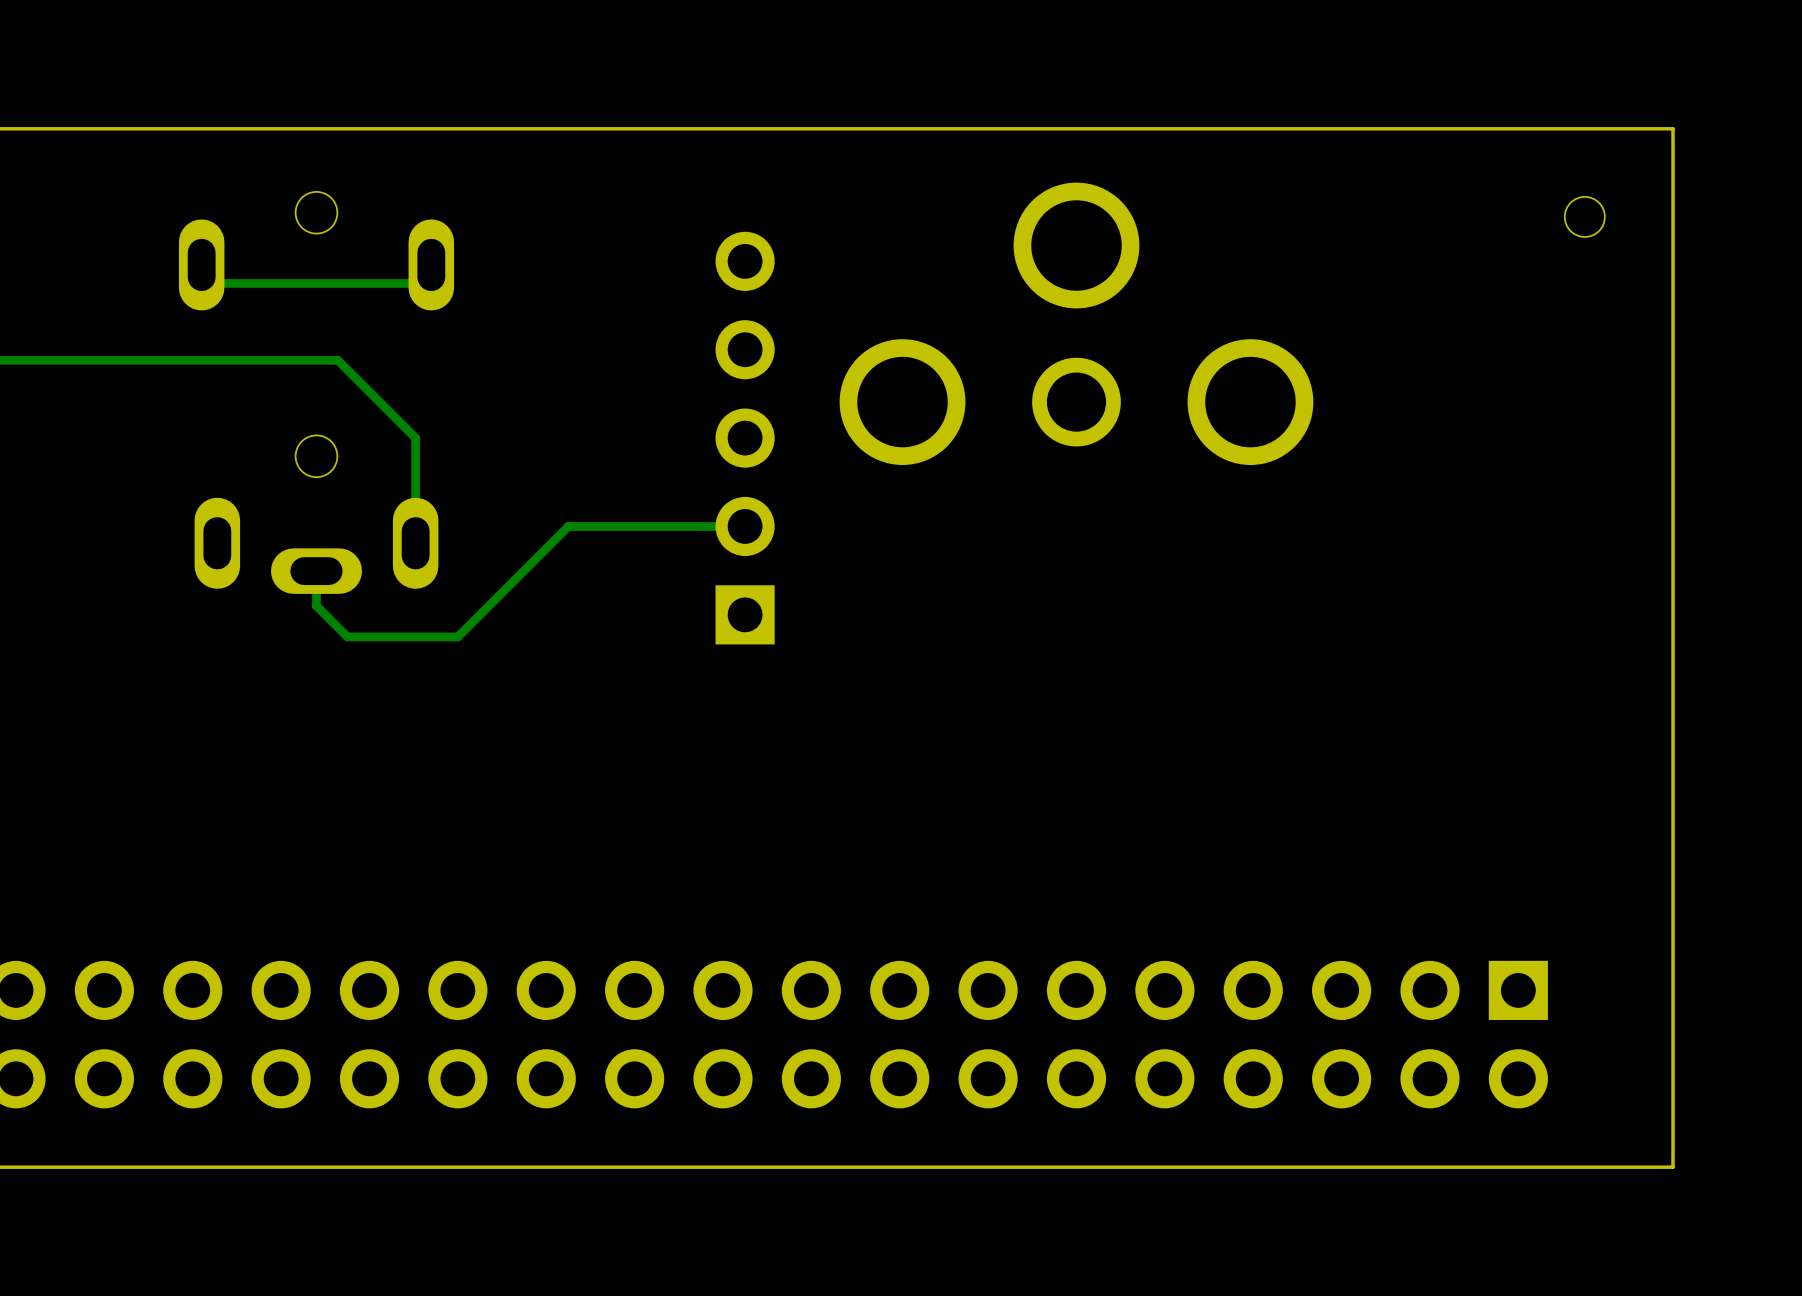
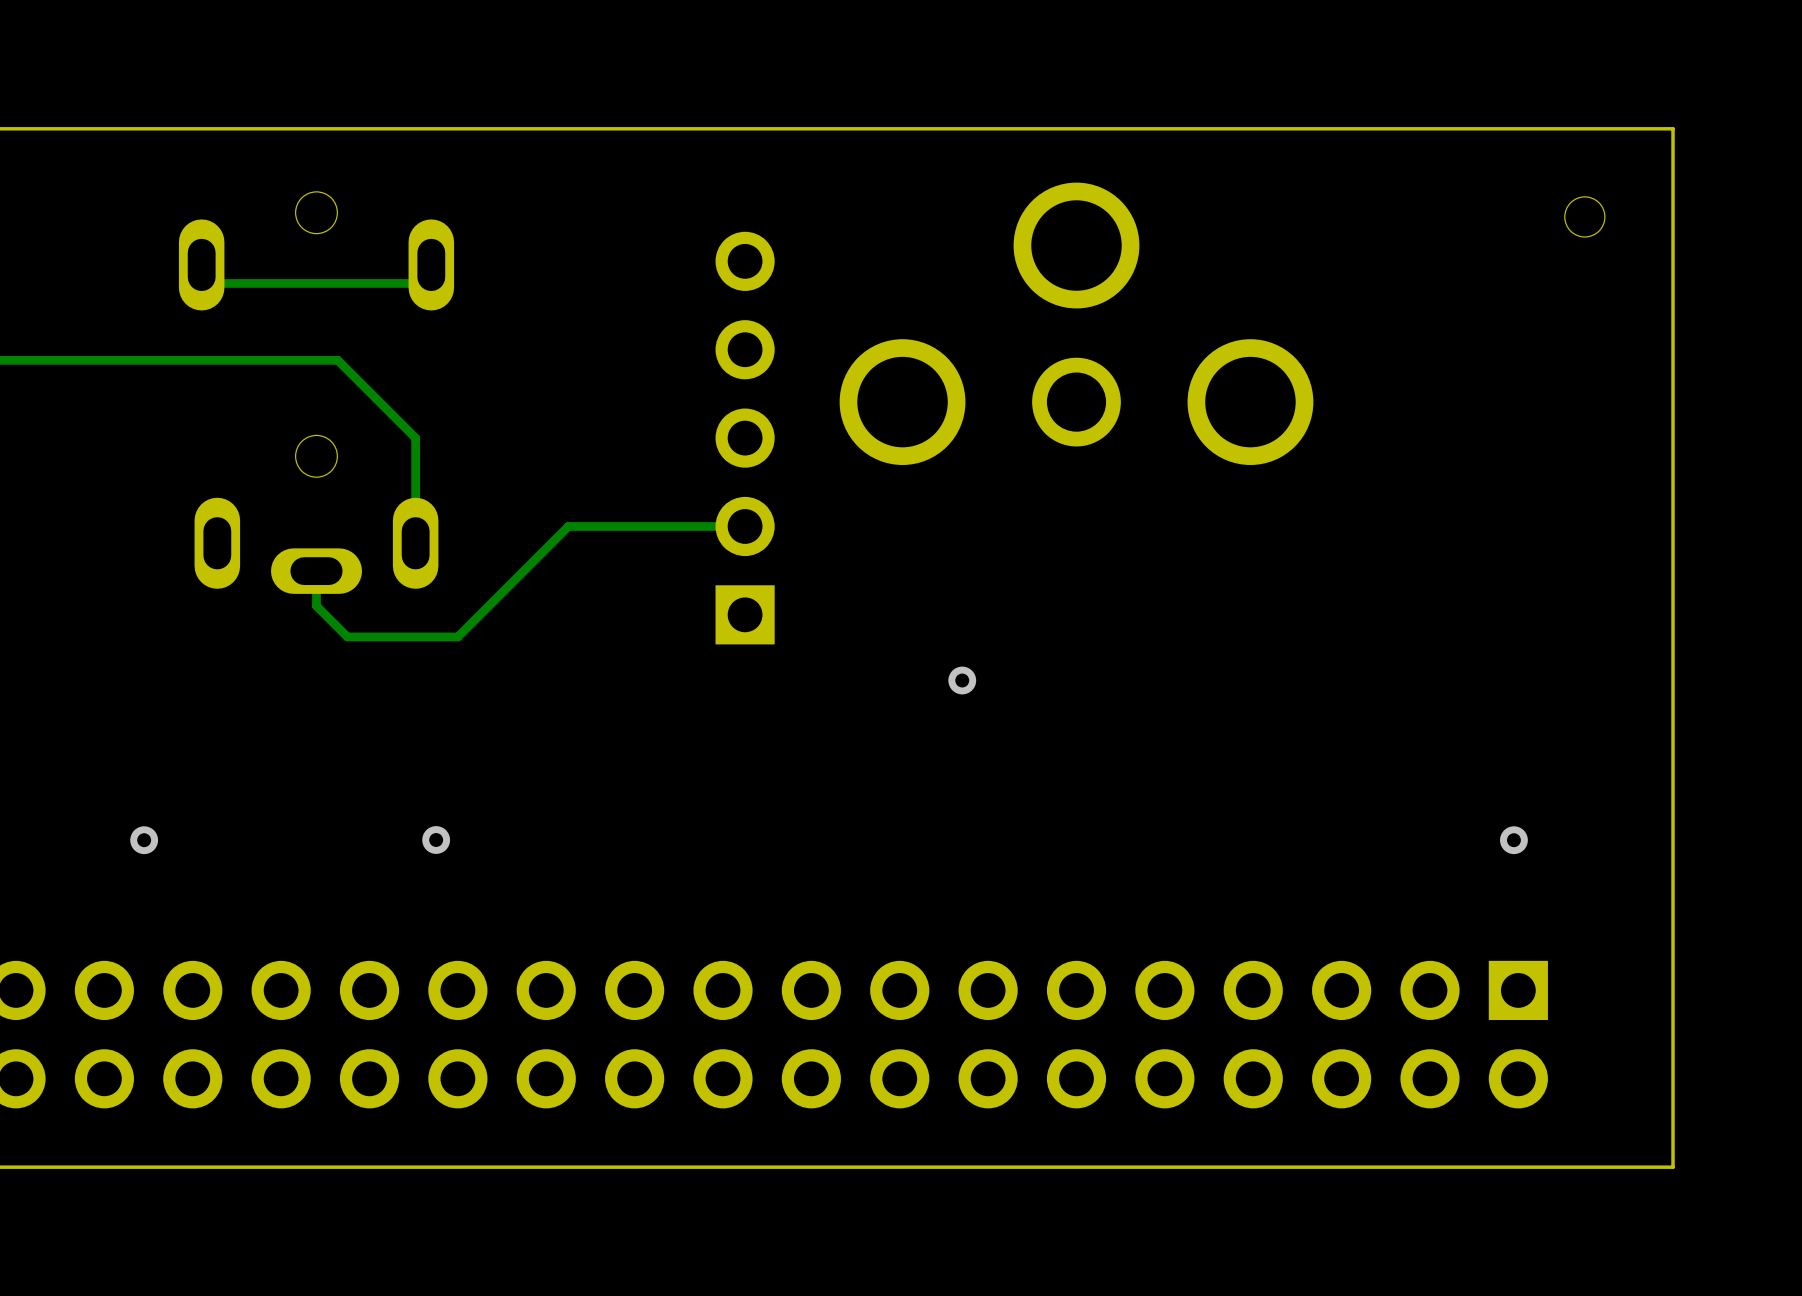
via: none -> (962, 680)
via: none -> (144, 840)
via: none -> (436, 840)
via: none -> (1513, 840)

